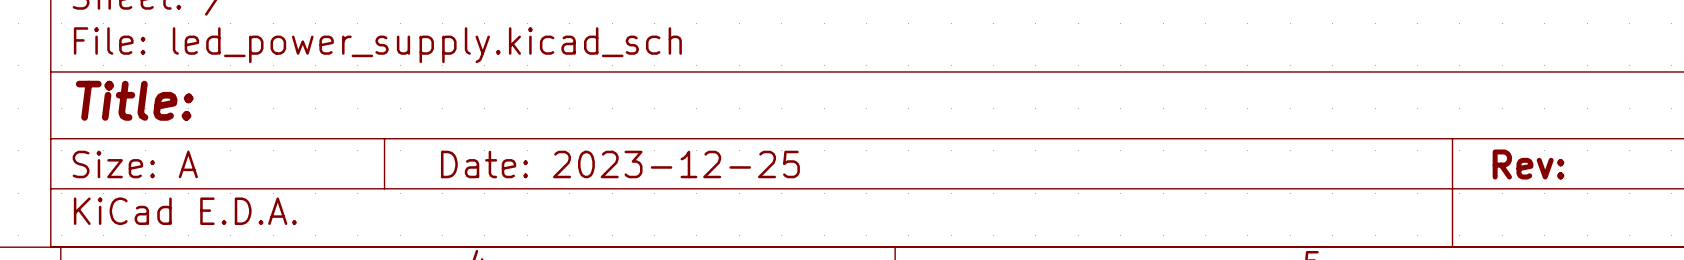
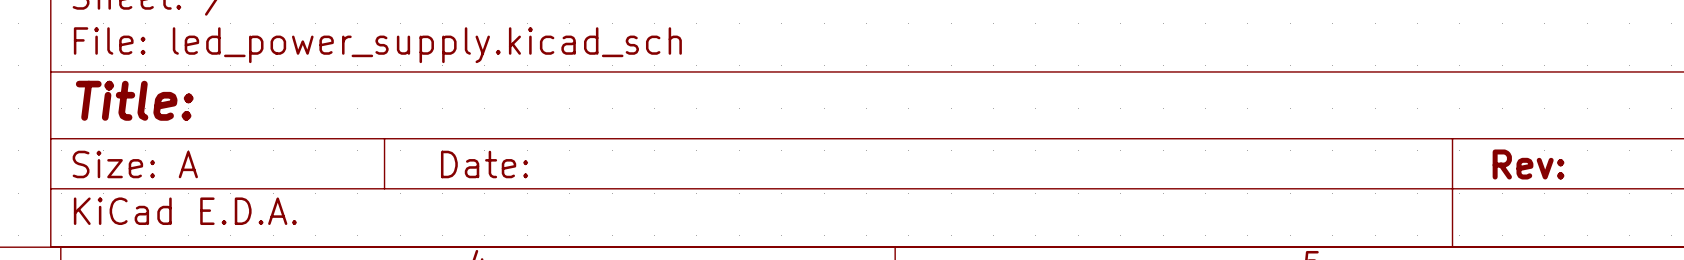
title block: Date: 2023-12-25 (620, 164) -> Date: (484, 164)

